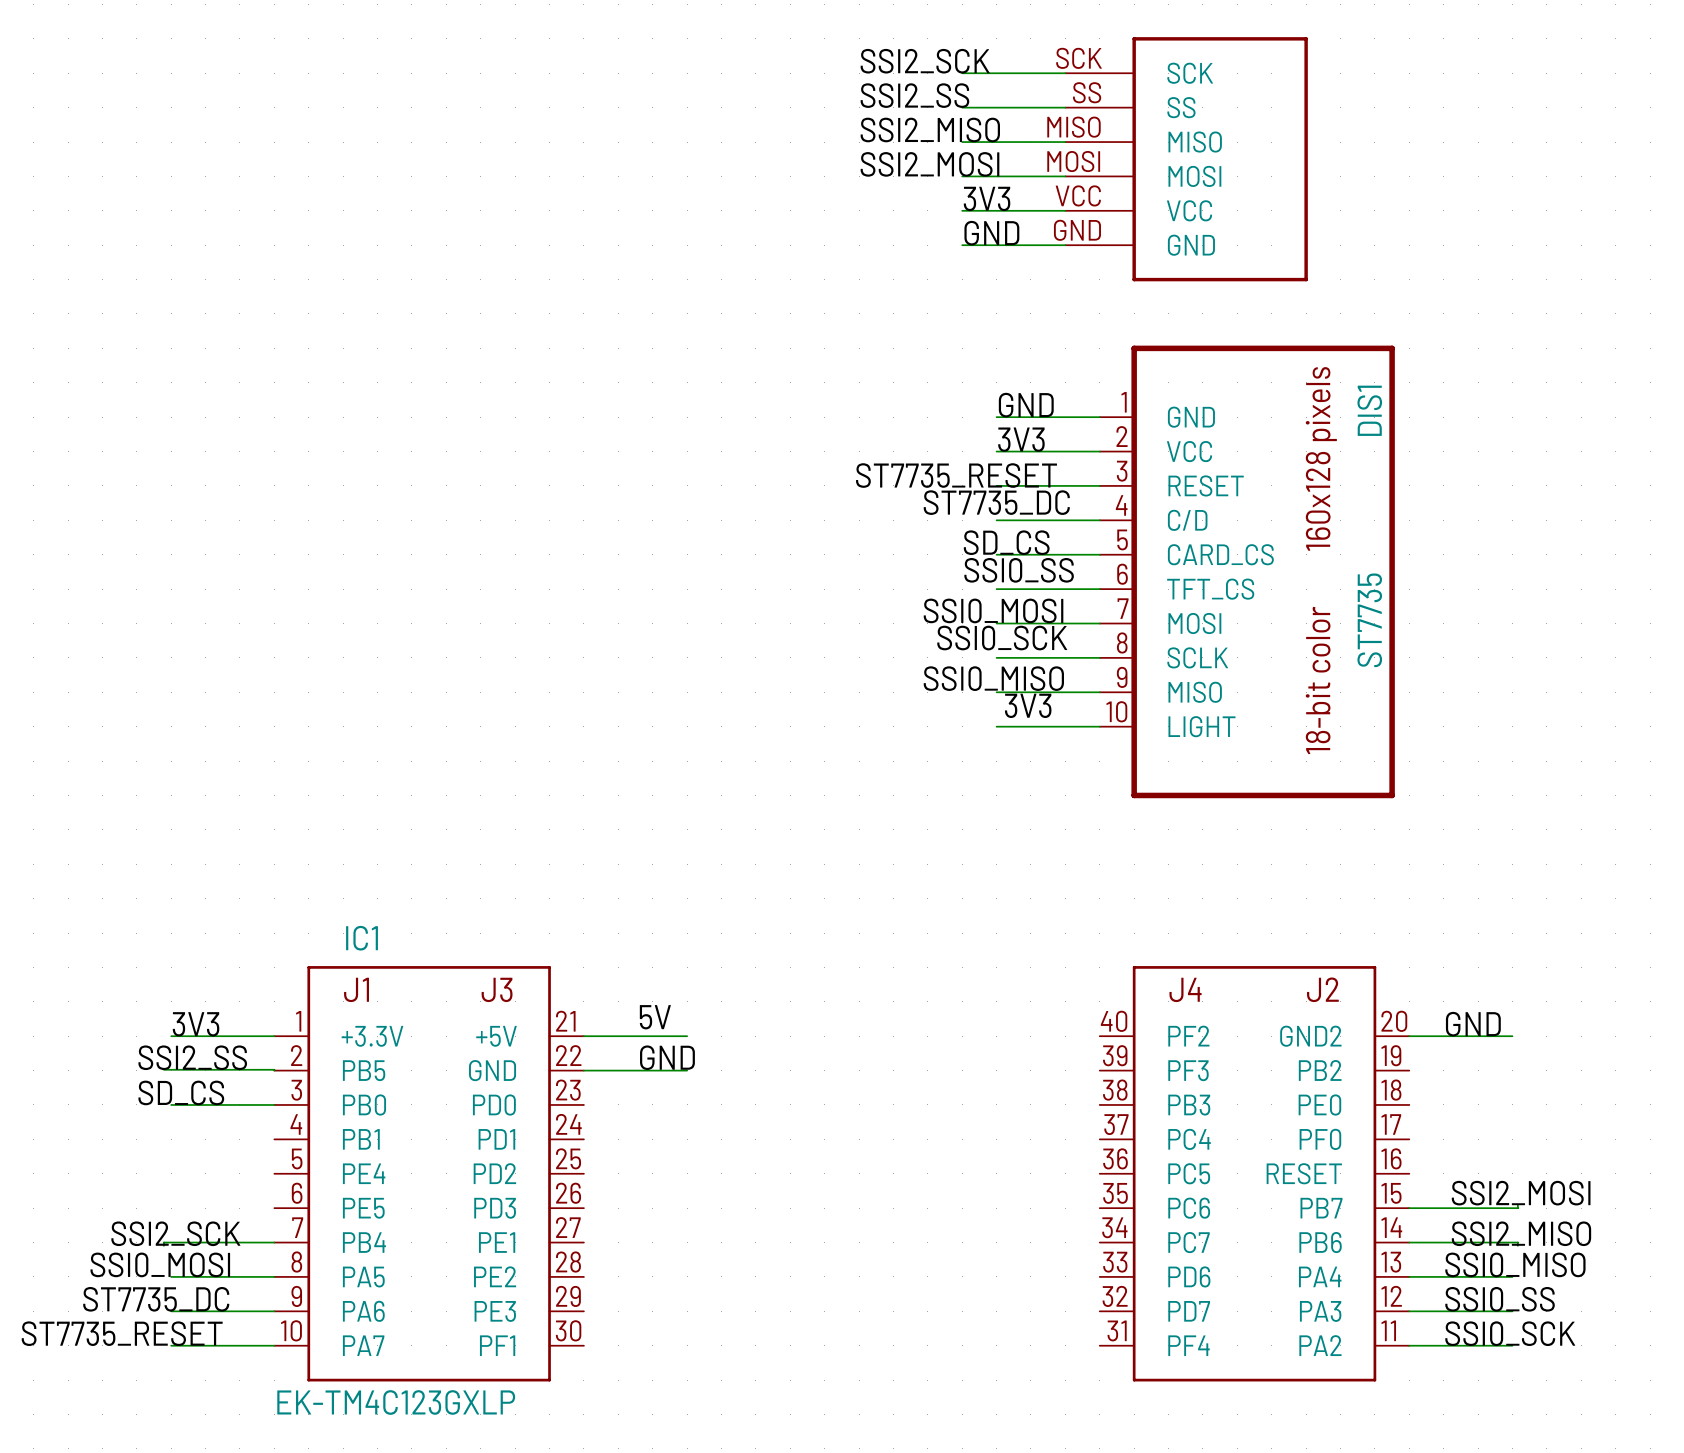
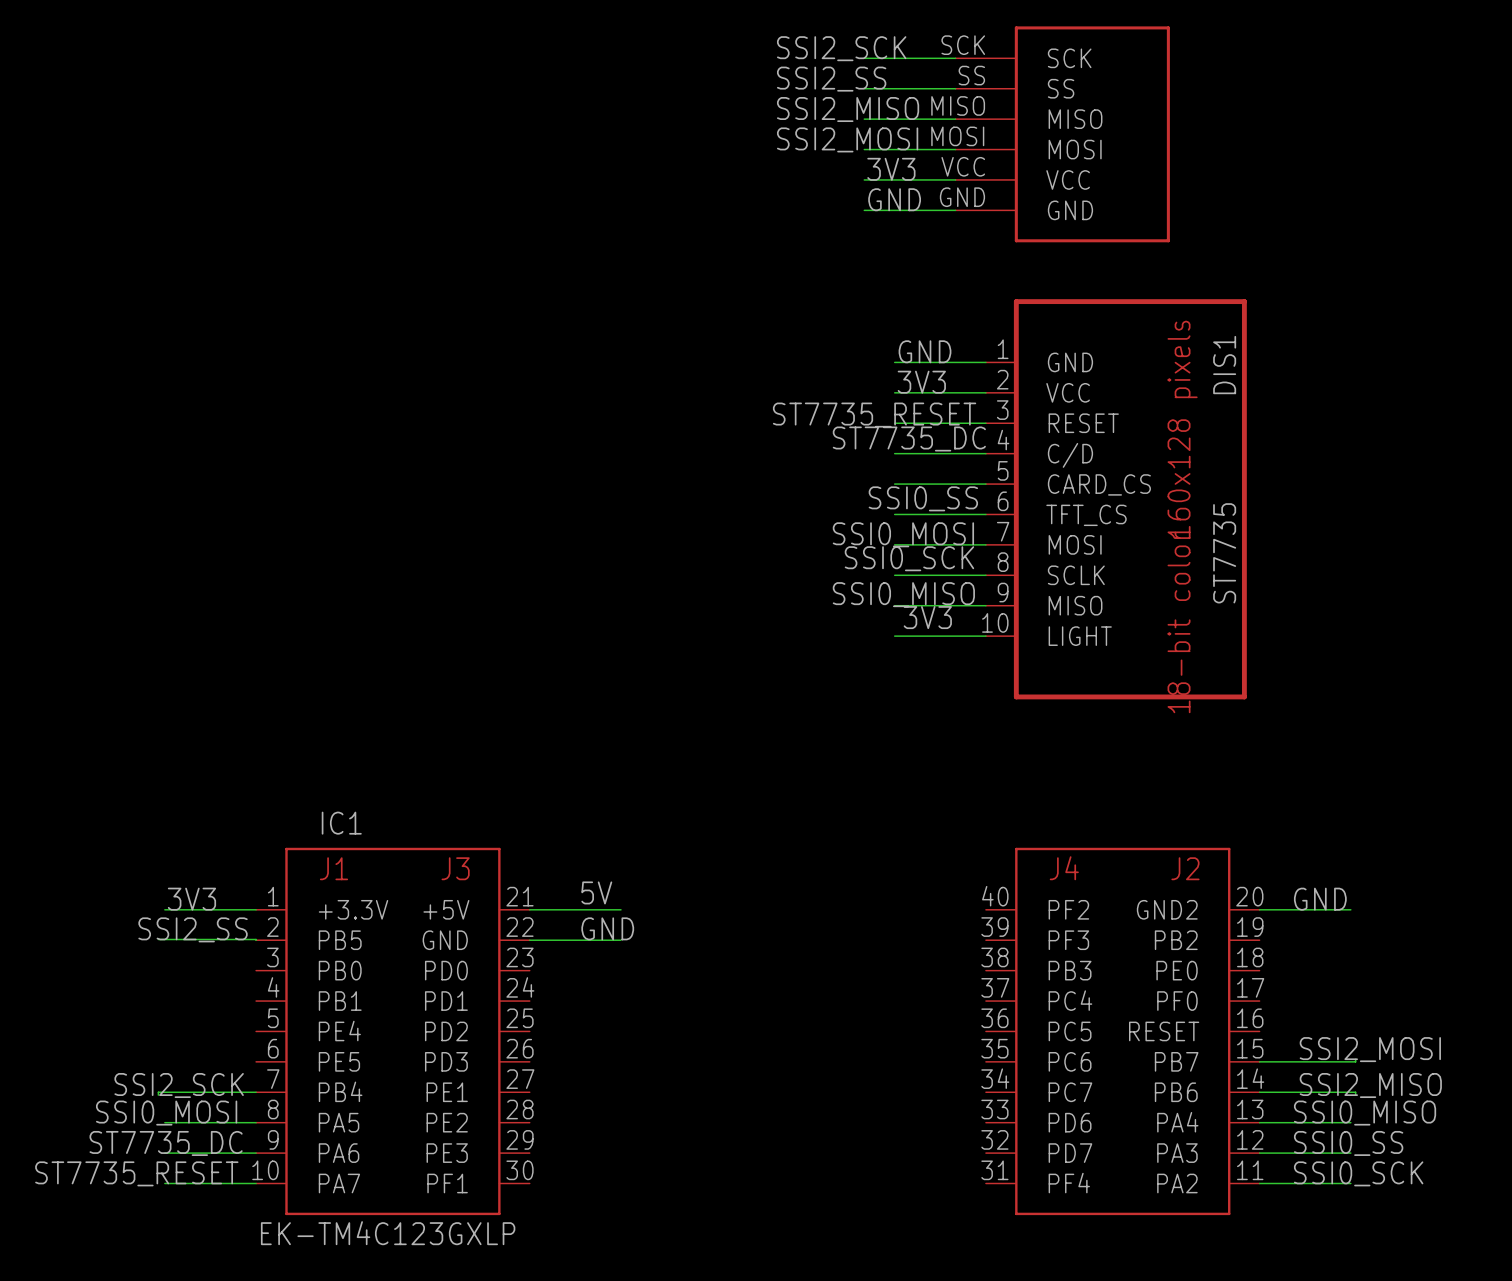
label: SD_CS (1006, 542) -> none
label: SD_CS (181, 1092) -> none
wire: (171, 1104) (274, 1104) -> none

